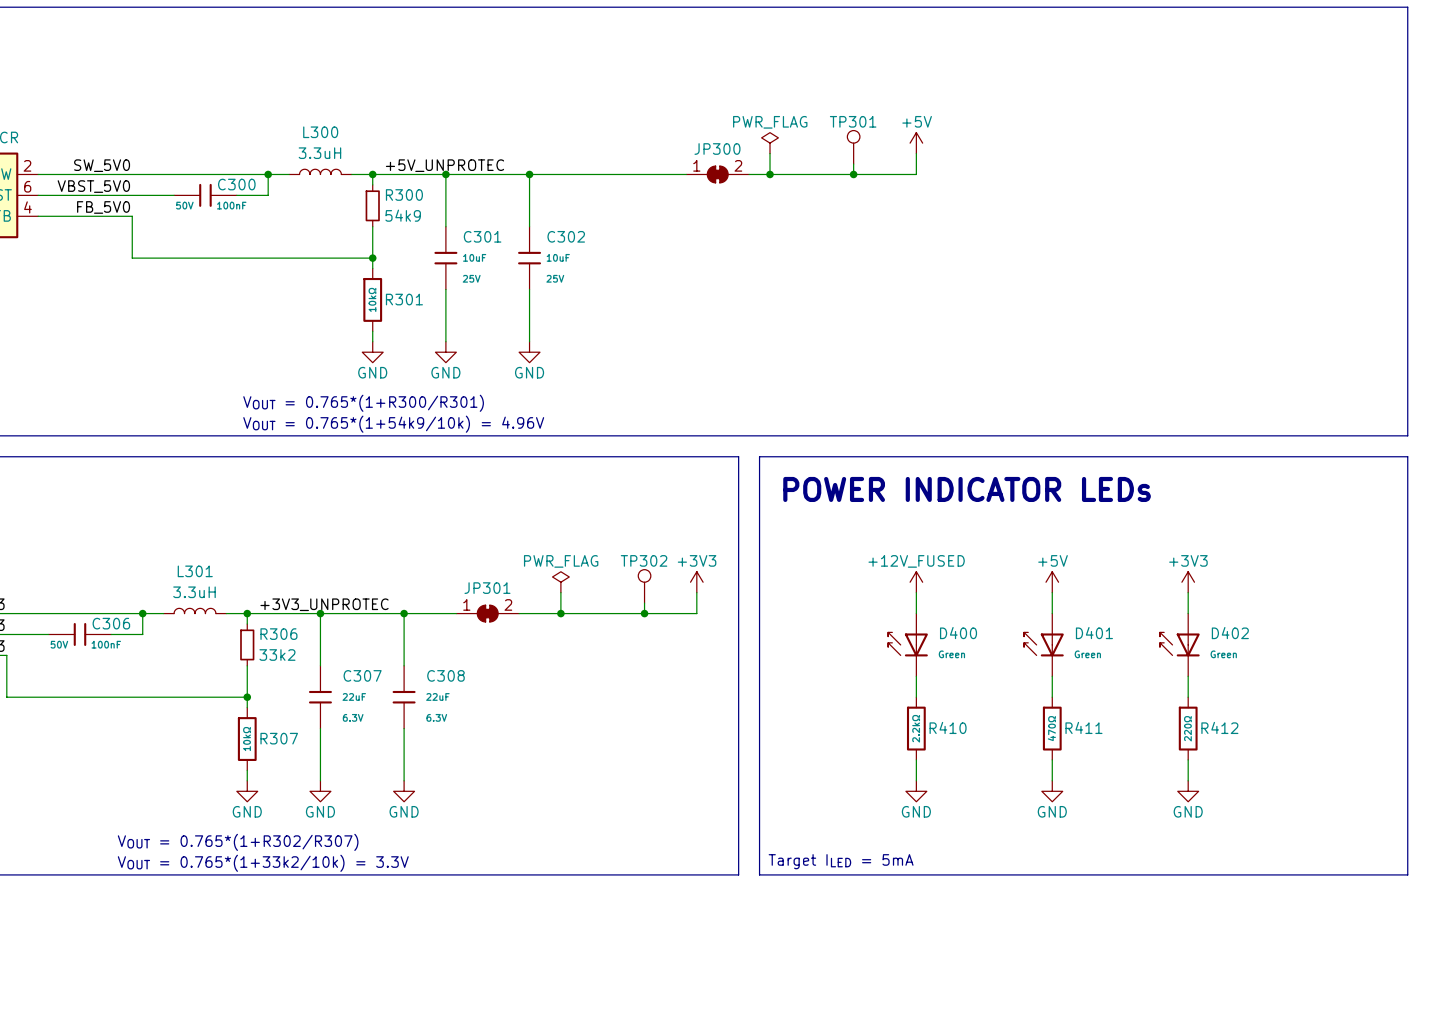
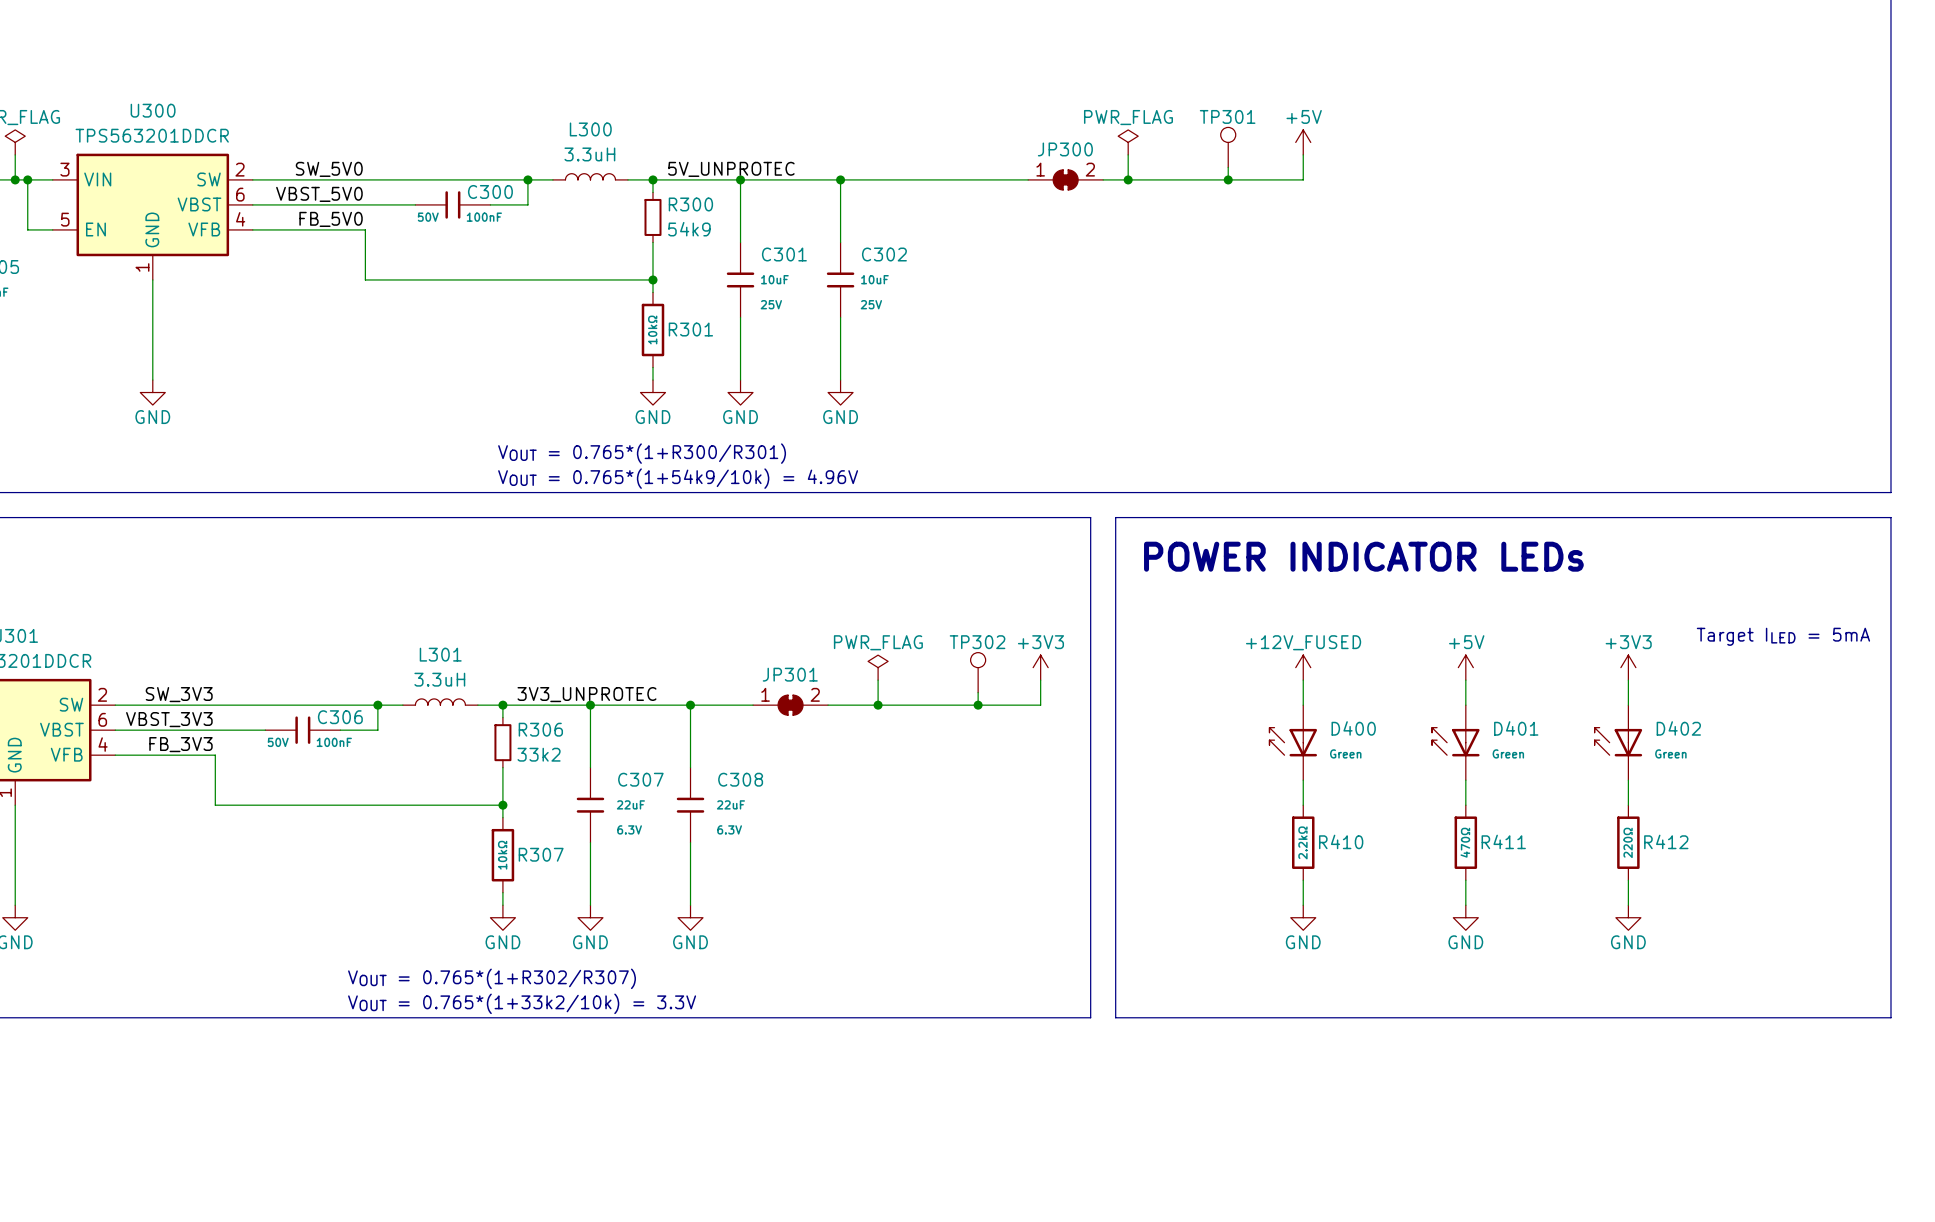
label: +5V_UNPROTEC (444, 165) -> 5V_UNPROTEC (731, 169)
text: none -> Target ILED = 5mA (1783, 636)
label: +3V3_UNPROTEC (324, 604) -> 3V3_UNPROTEC (586, 694)
text: Target ILED = 5mA (841, 861) -> none

